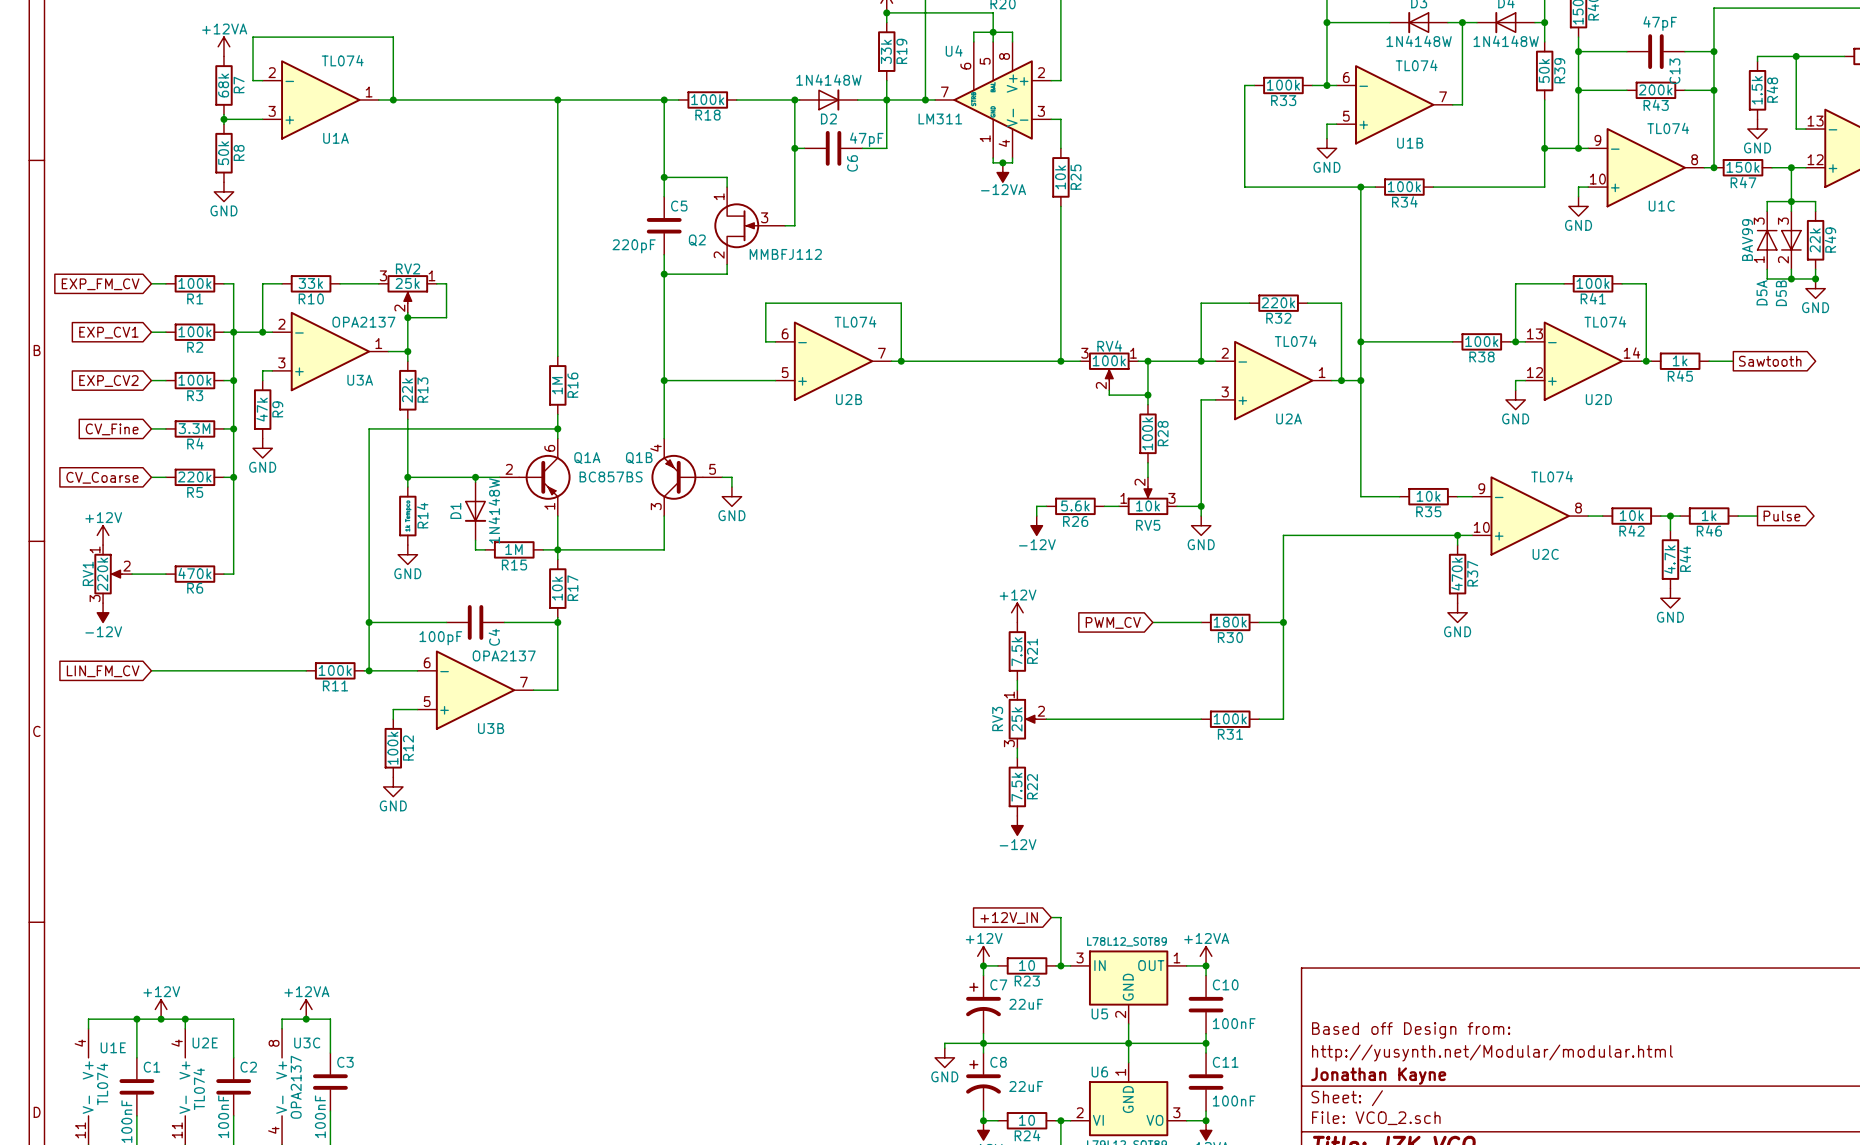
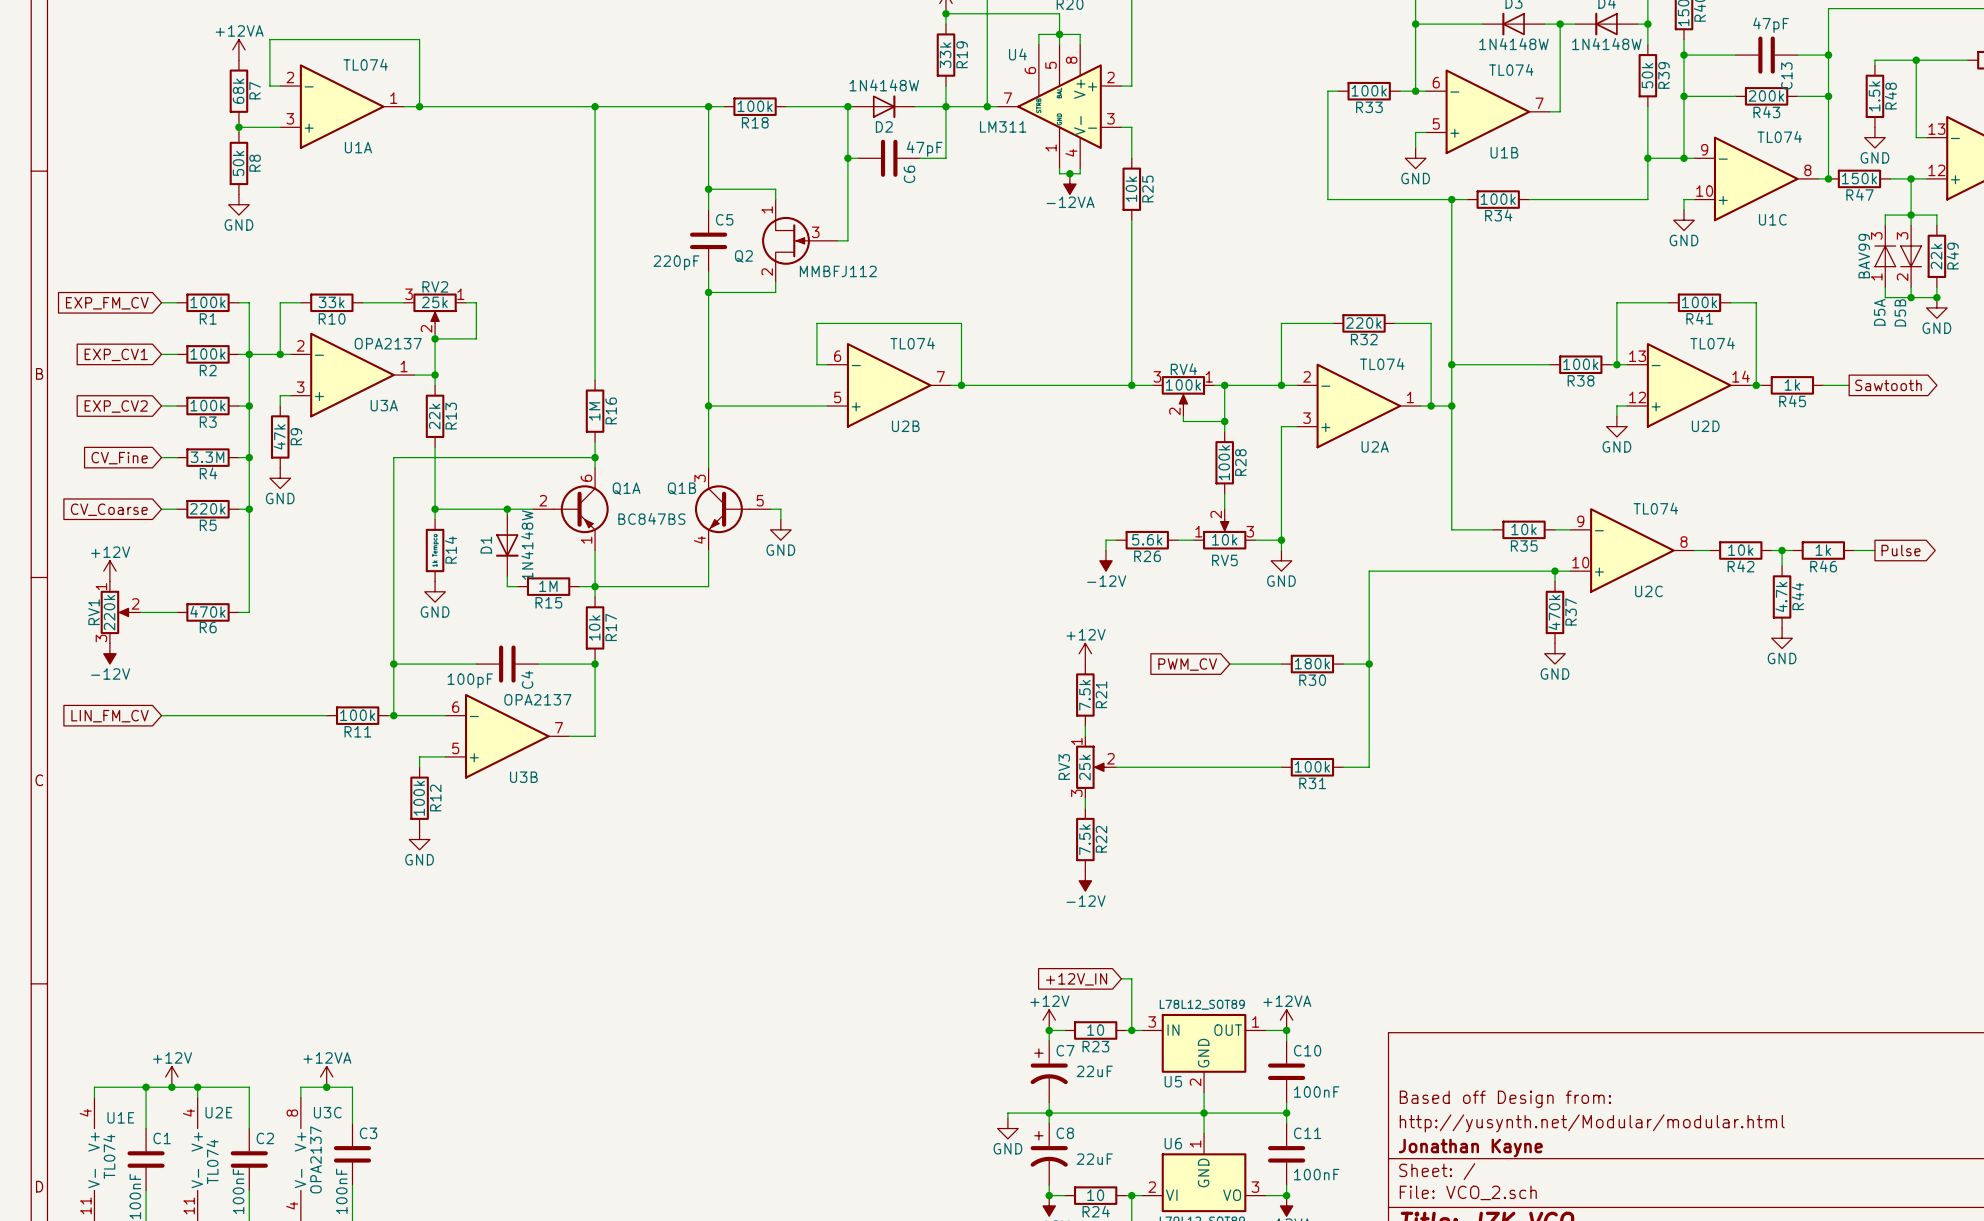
Q1B symbol: [651, 438, 723, 517] -> [694, 467, 771, 551]
Q1A value: BC857BS (611, 476) -> BC847BS (651, 518)

